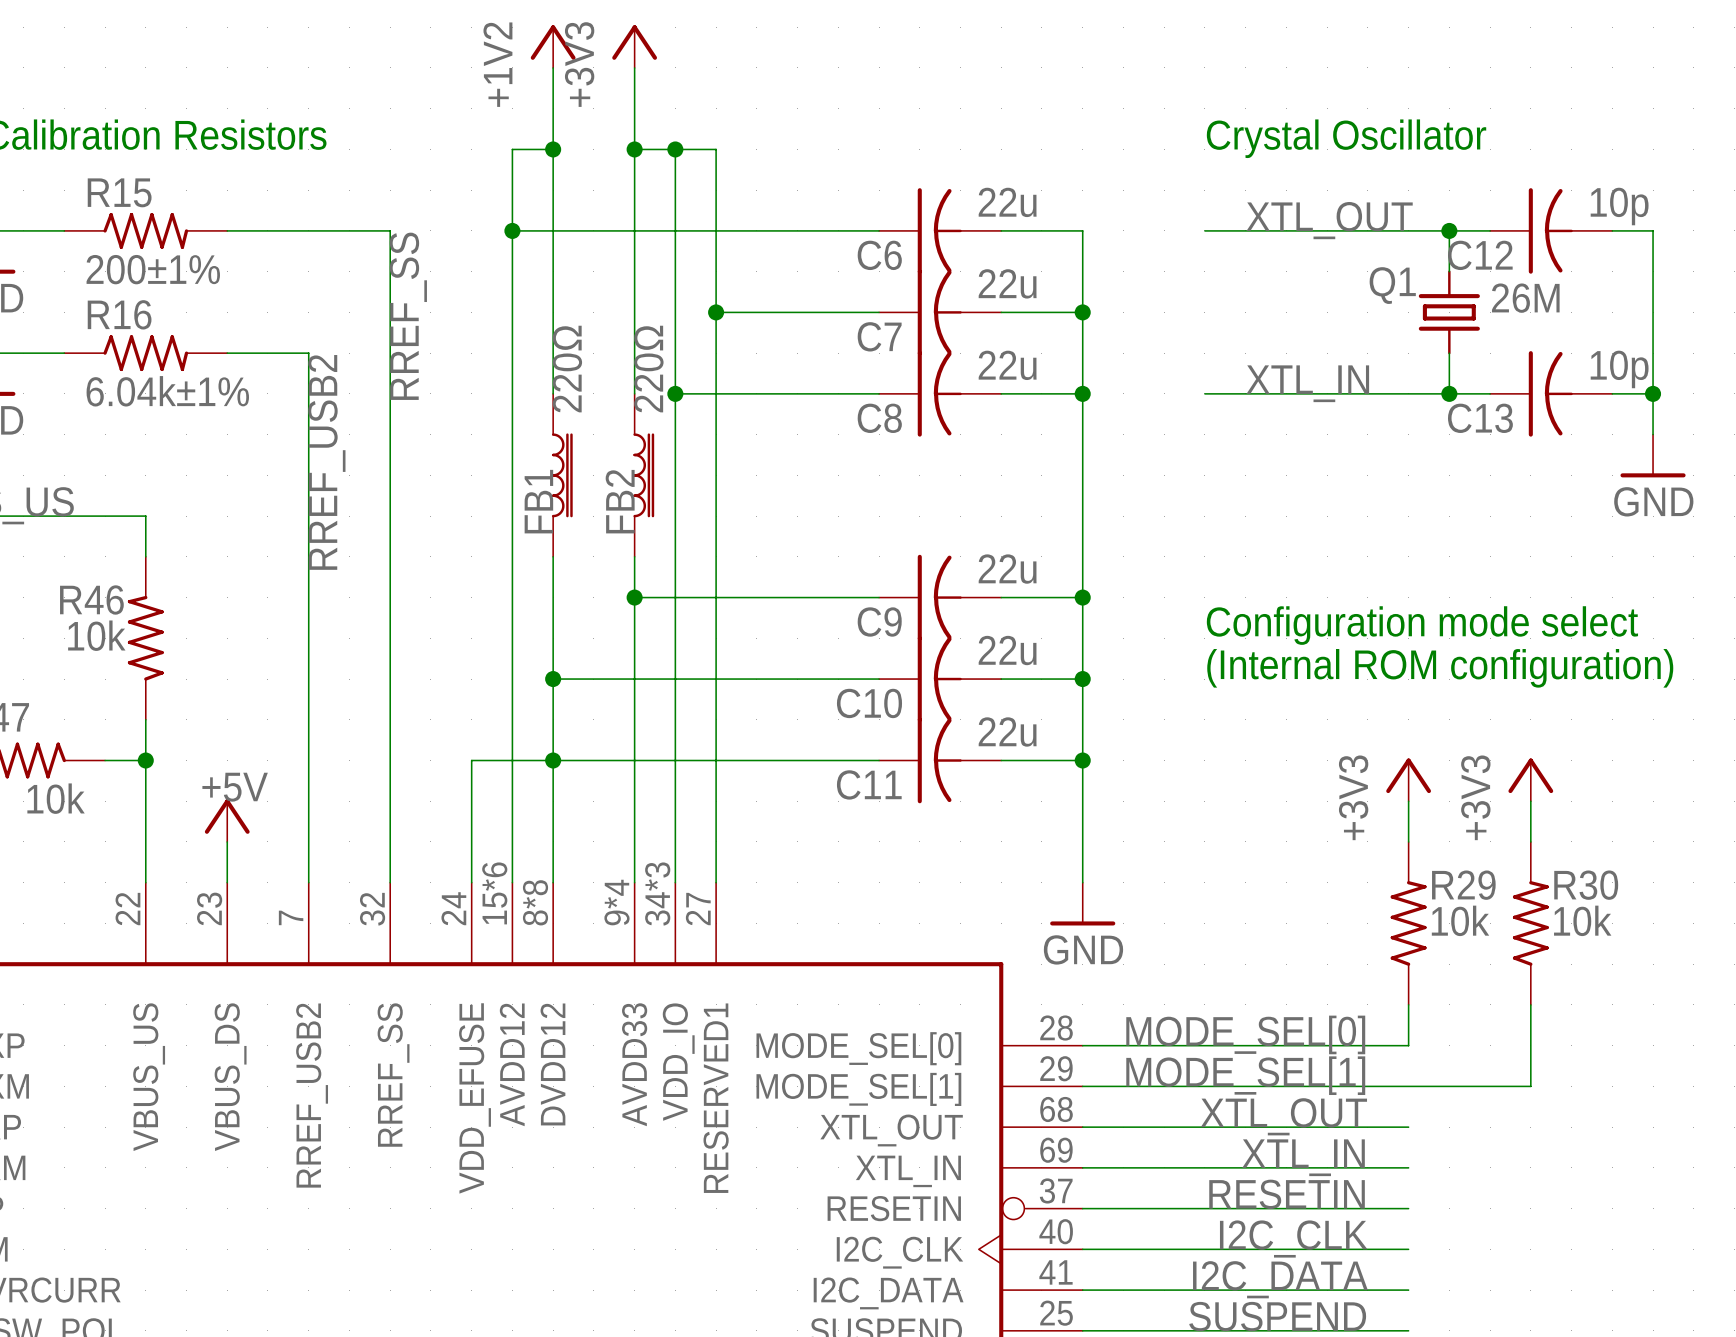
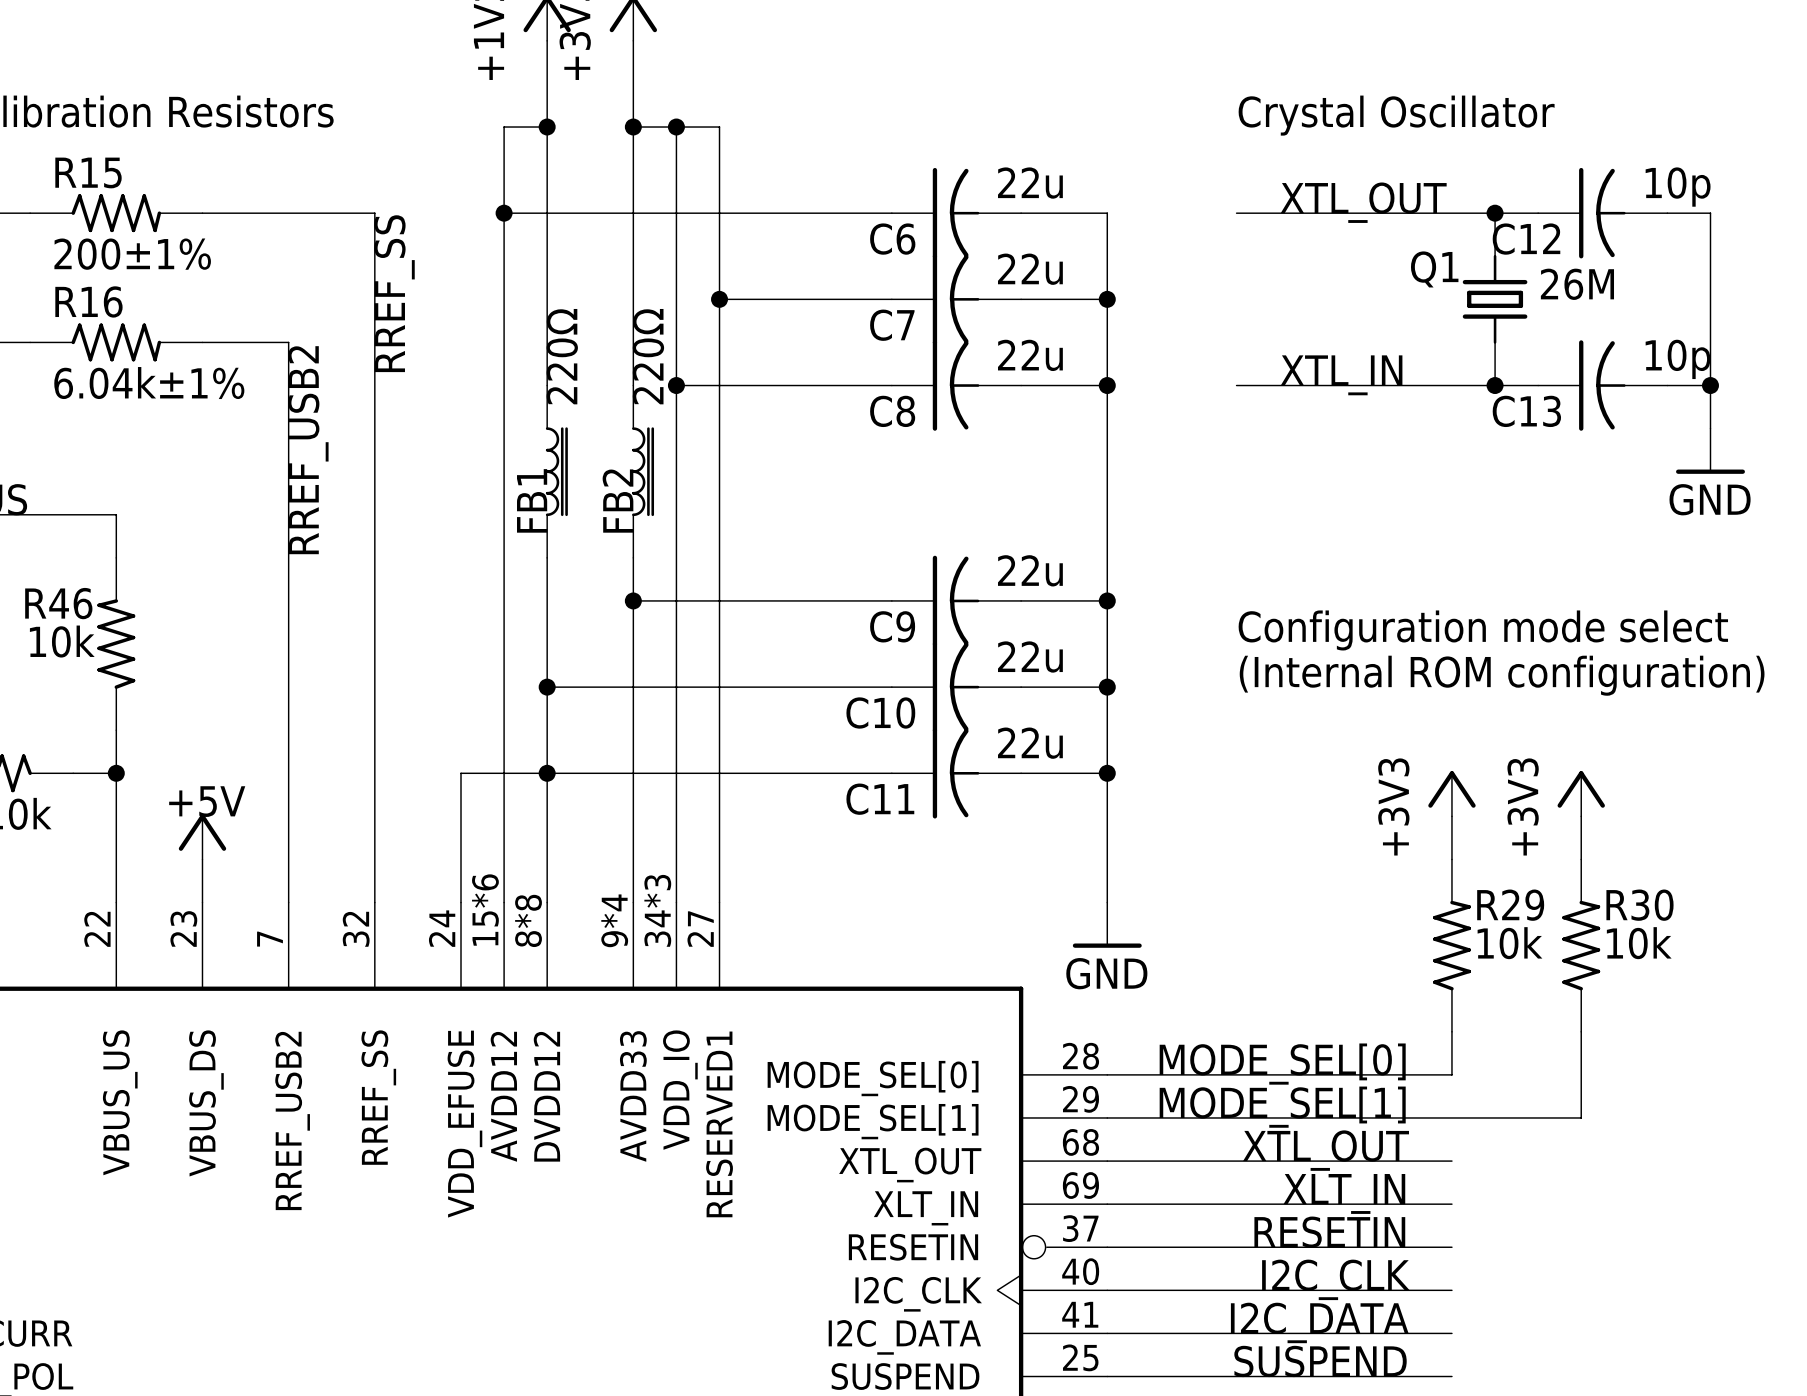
label: XTL_IN (1303, 1157) -> XLT_IN (1344, 1193)
part pin name: XTL_IN (908, 1171) -> XLT_IN (925, 1208)

